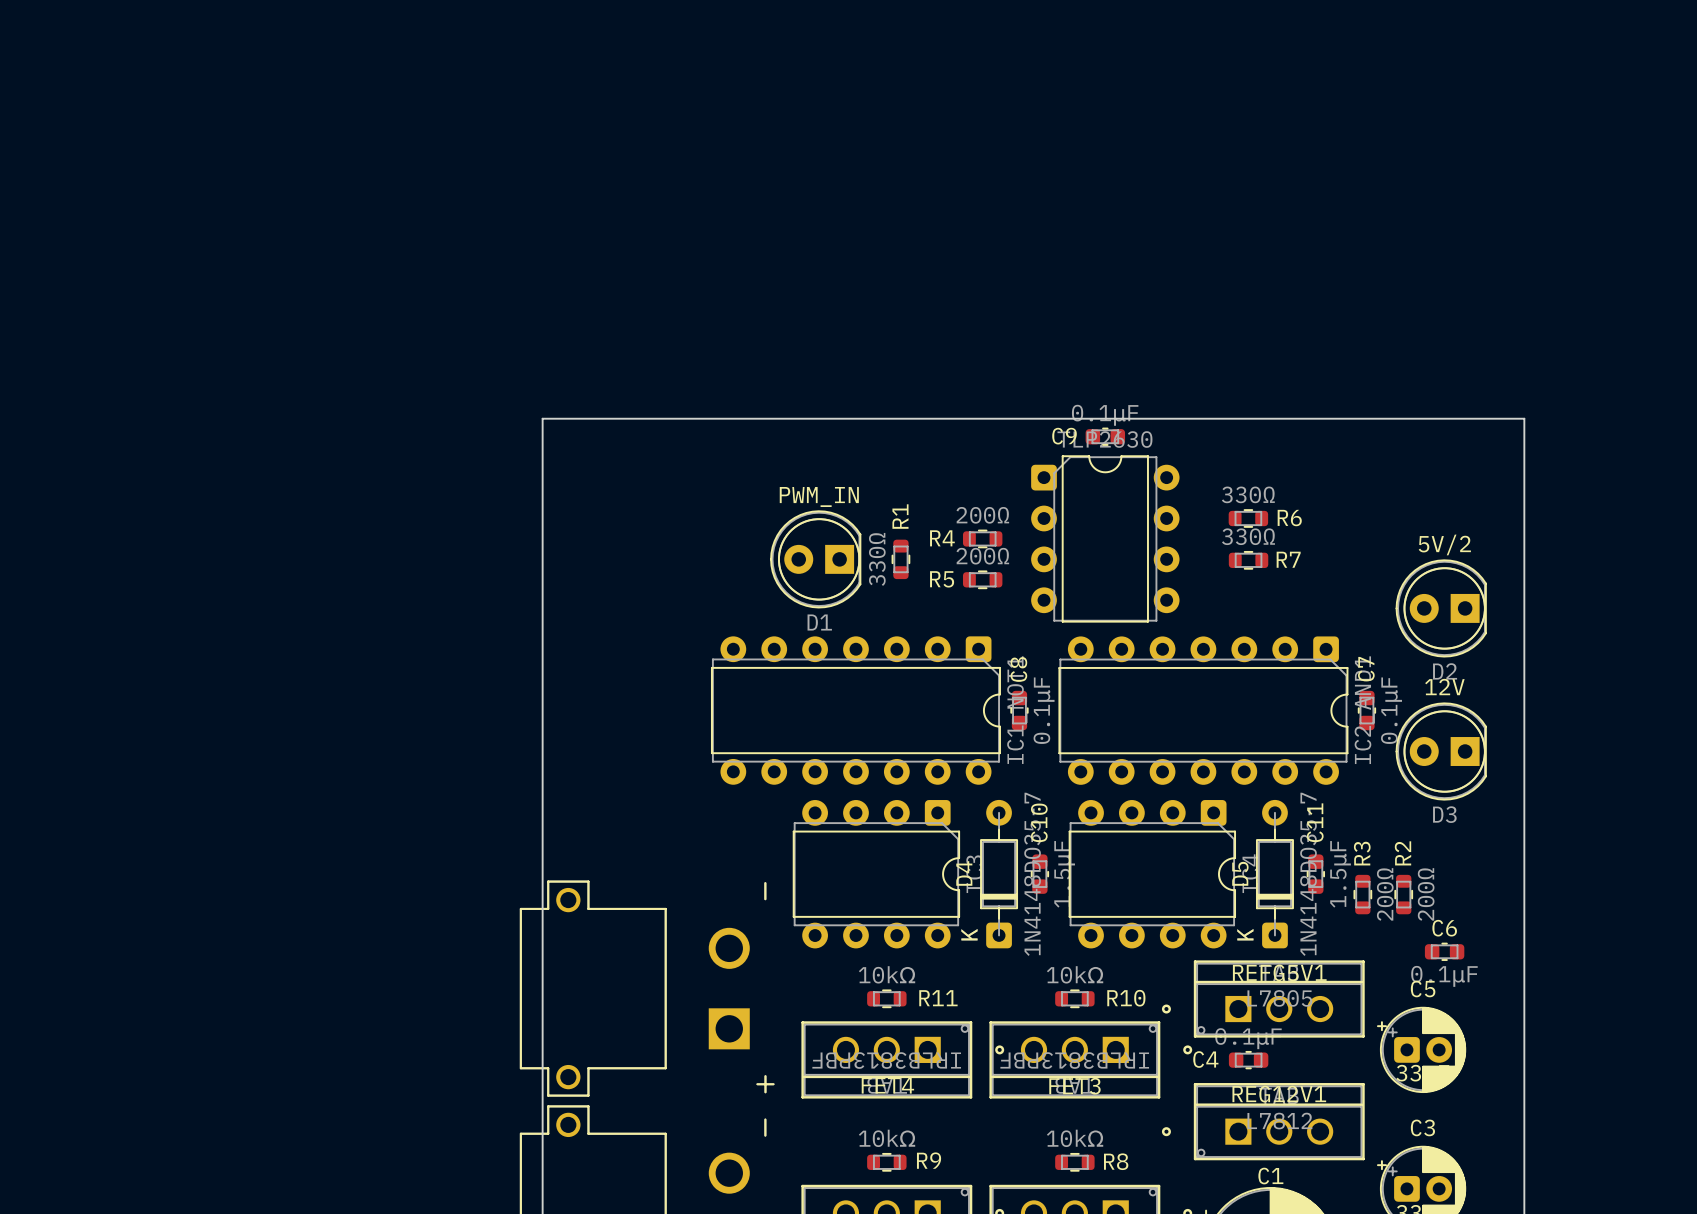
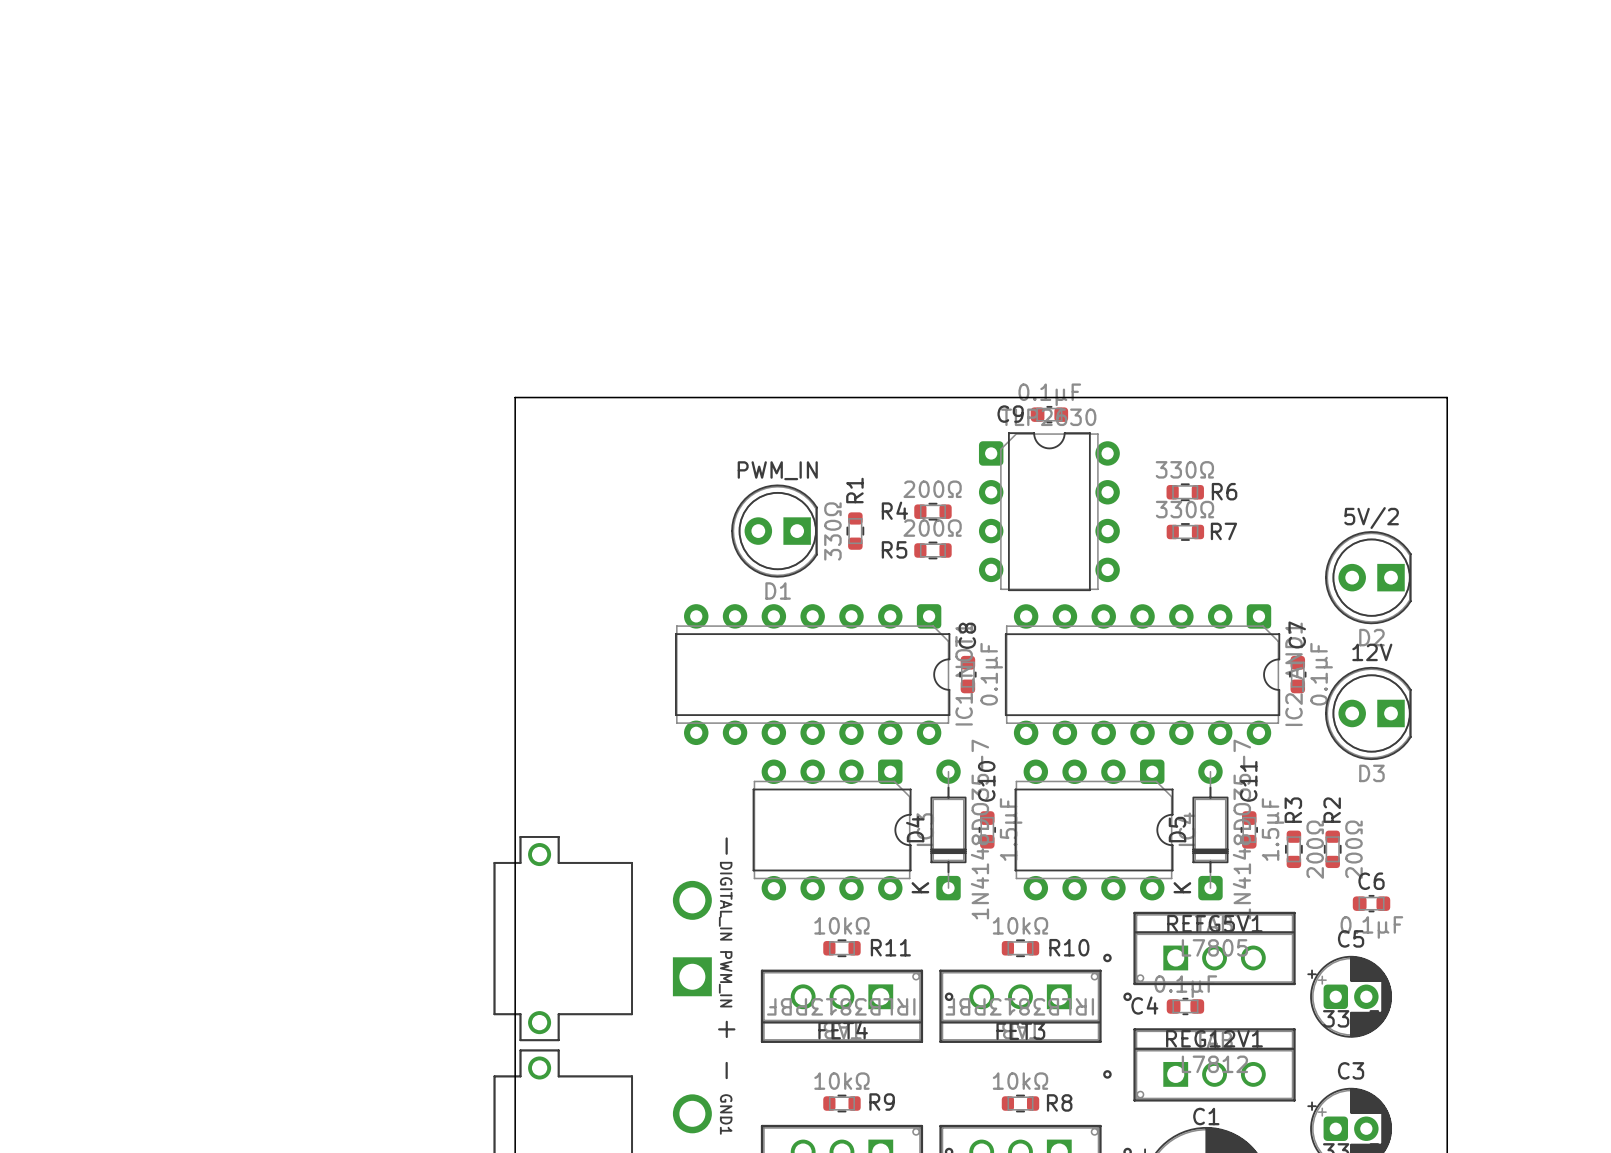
text: none -> DIGITAL_IN (725, 901)
text: none -> PWM_IN (725, 979)
text: none -> GND1 (726, 1114)

